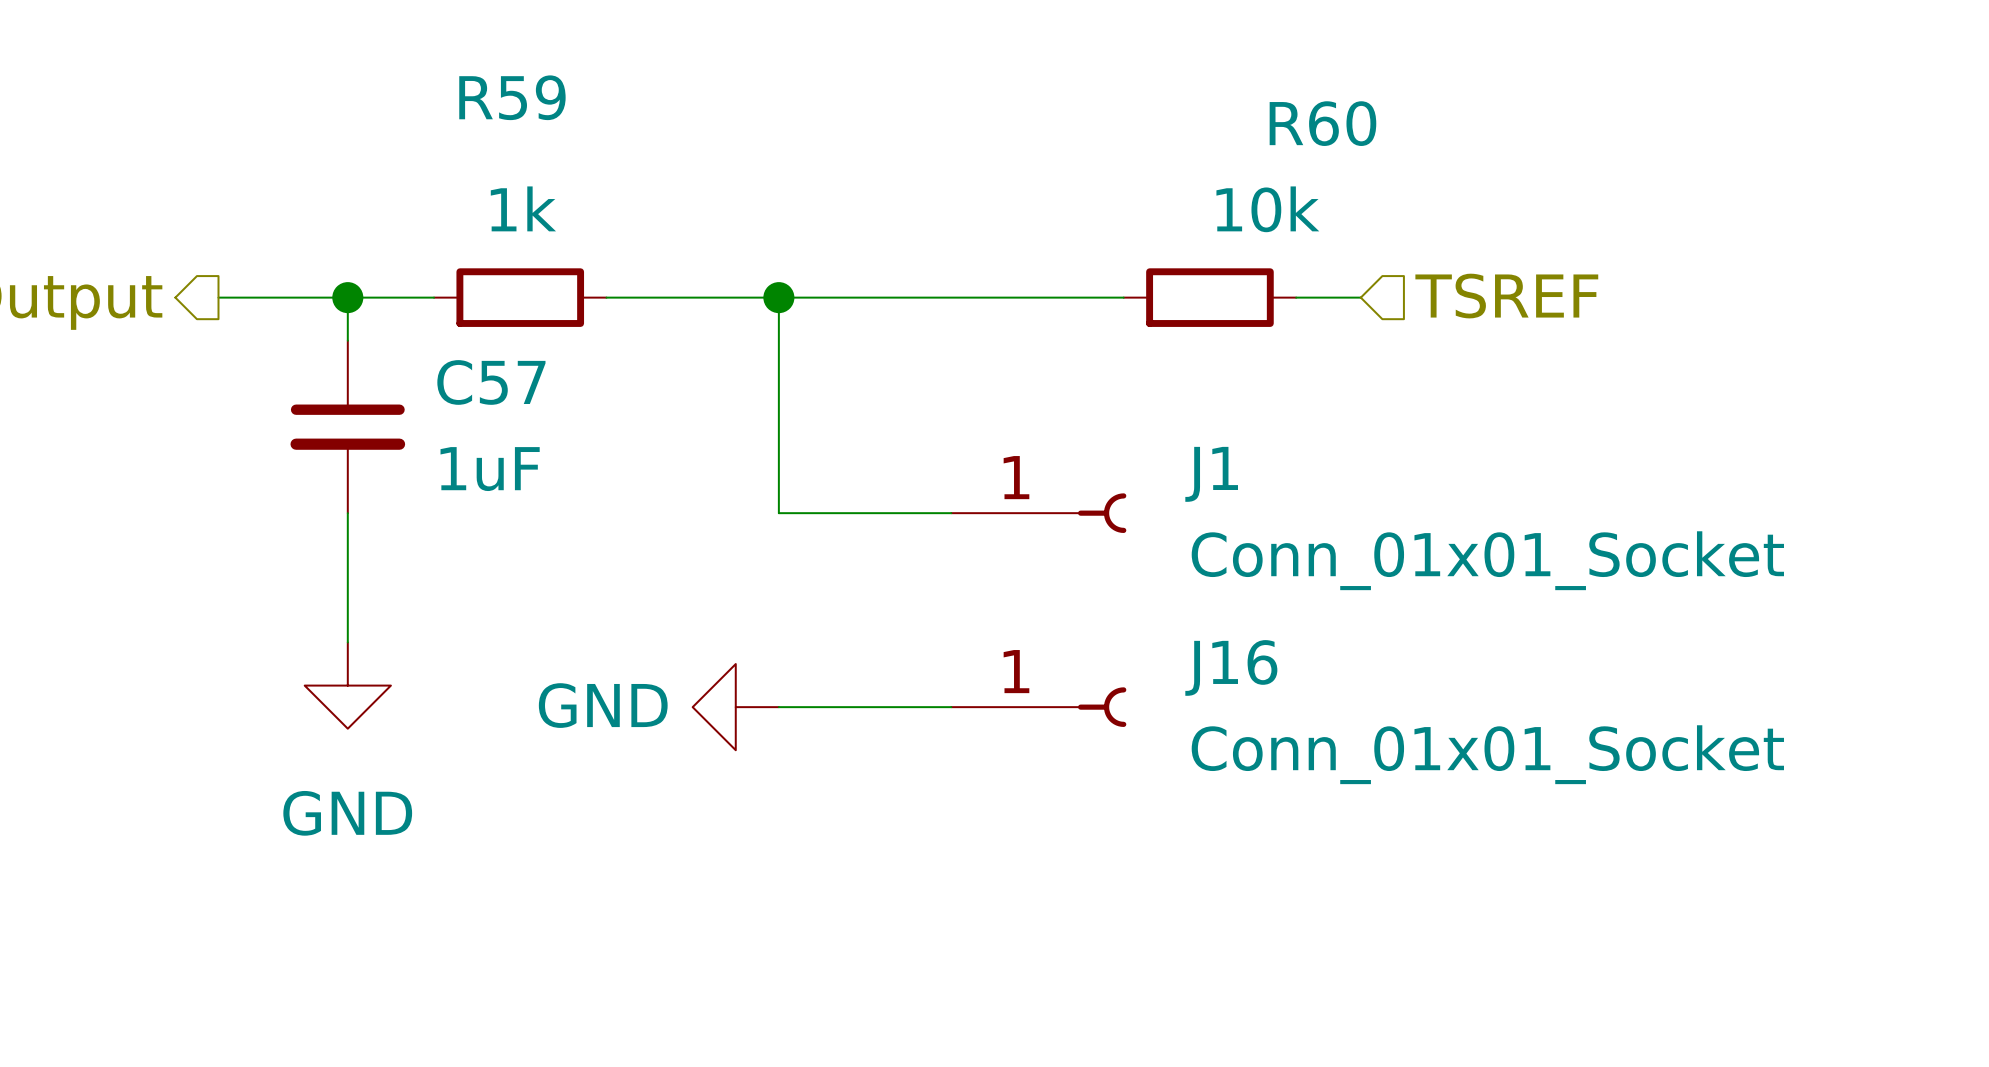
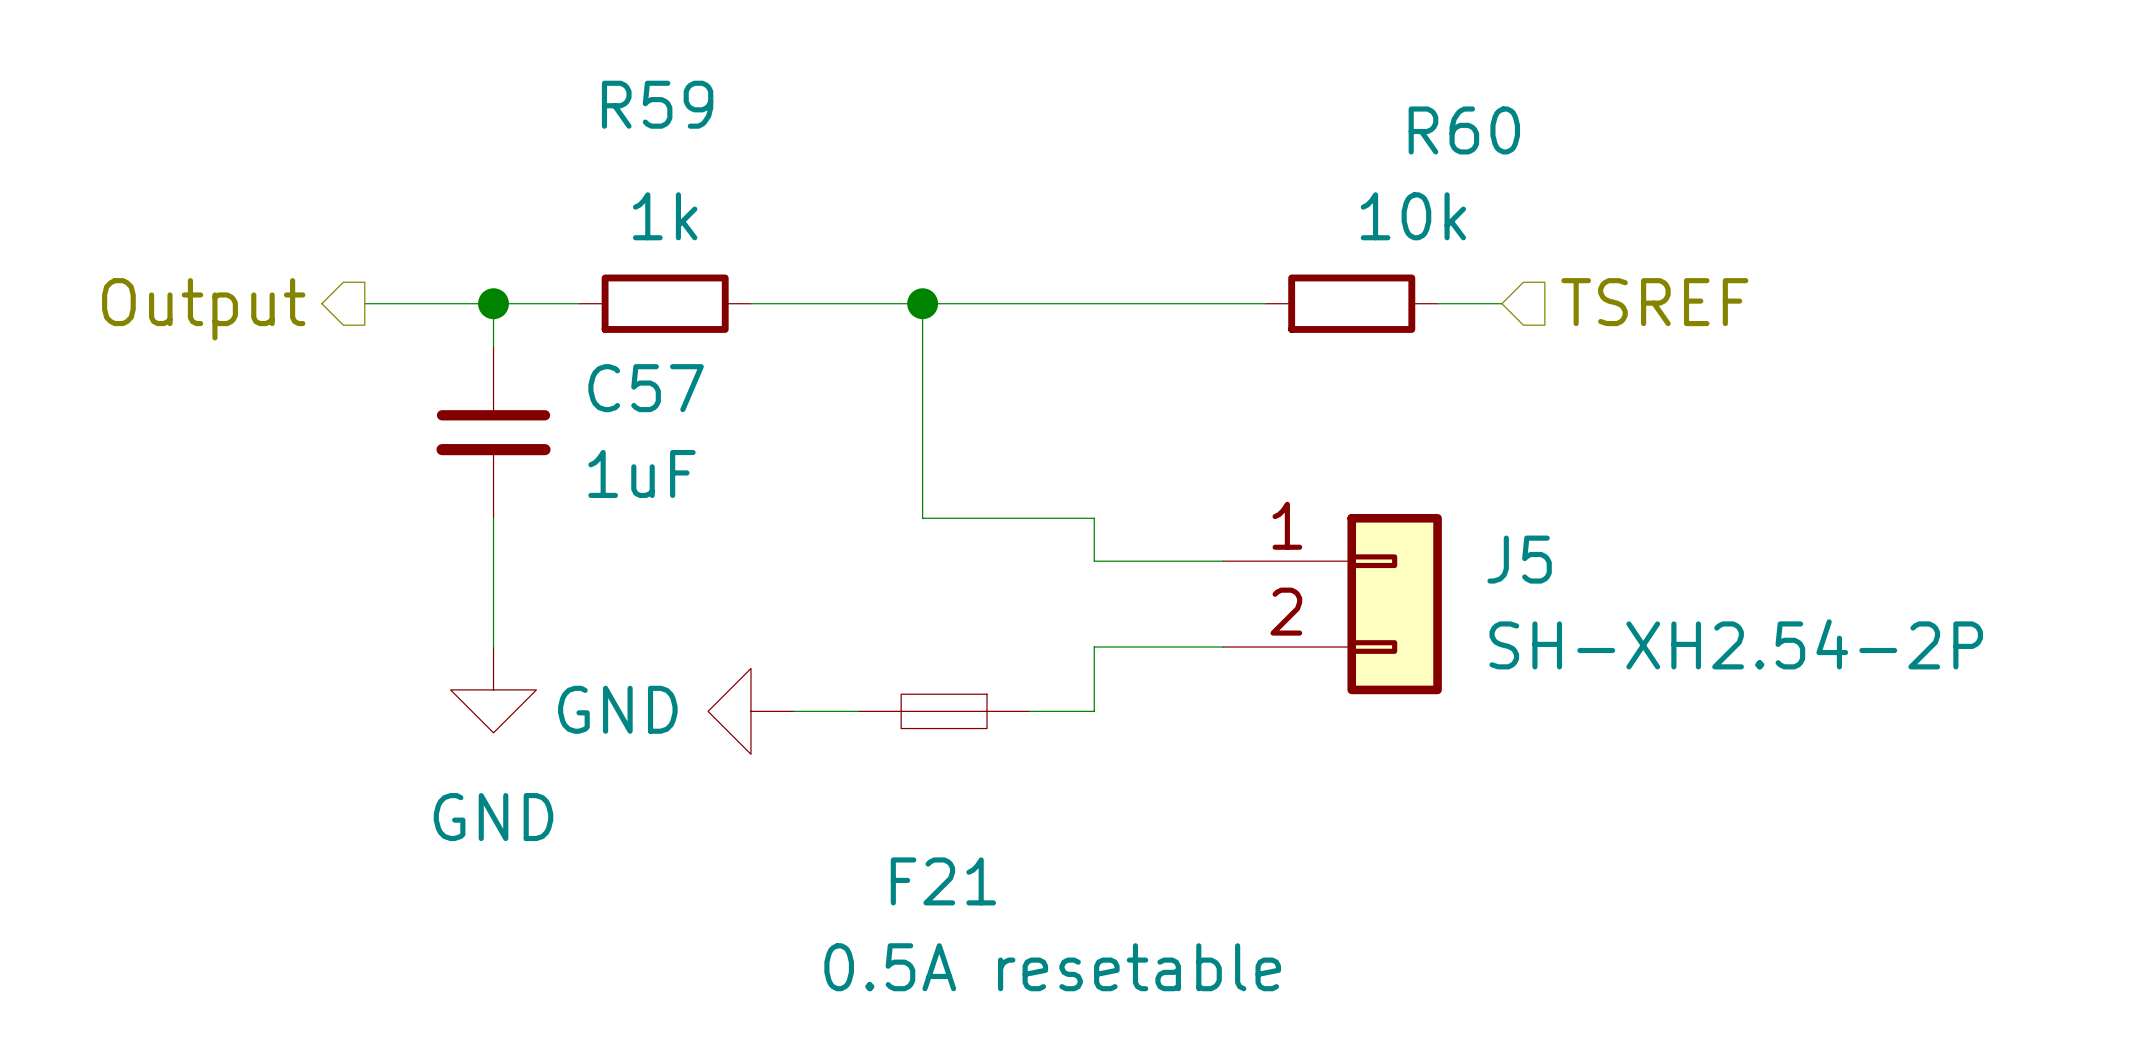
wire: none -> (1094, 518) (1094, 561) (1223, 561)
J1: Conn_01x01_Socket (1038, 513) -> none
J5: none -> SH-XH2.54-2P (1332, 604)
wire: none -> (1223, 647) (1094, 647) (1094, 711)
wire: none -> (793, 711) (858, 711)
power symbol position: GND (735, 707) -> GND (750, 711)
F21: none -> 0.5A resetable (944, 711)
J16: Conn_01x01_Socket (1038, 707) -> none

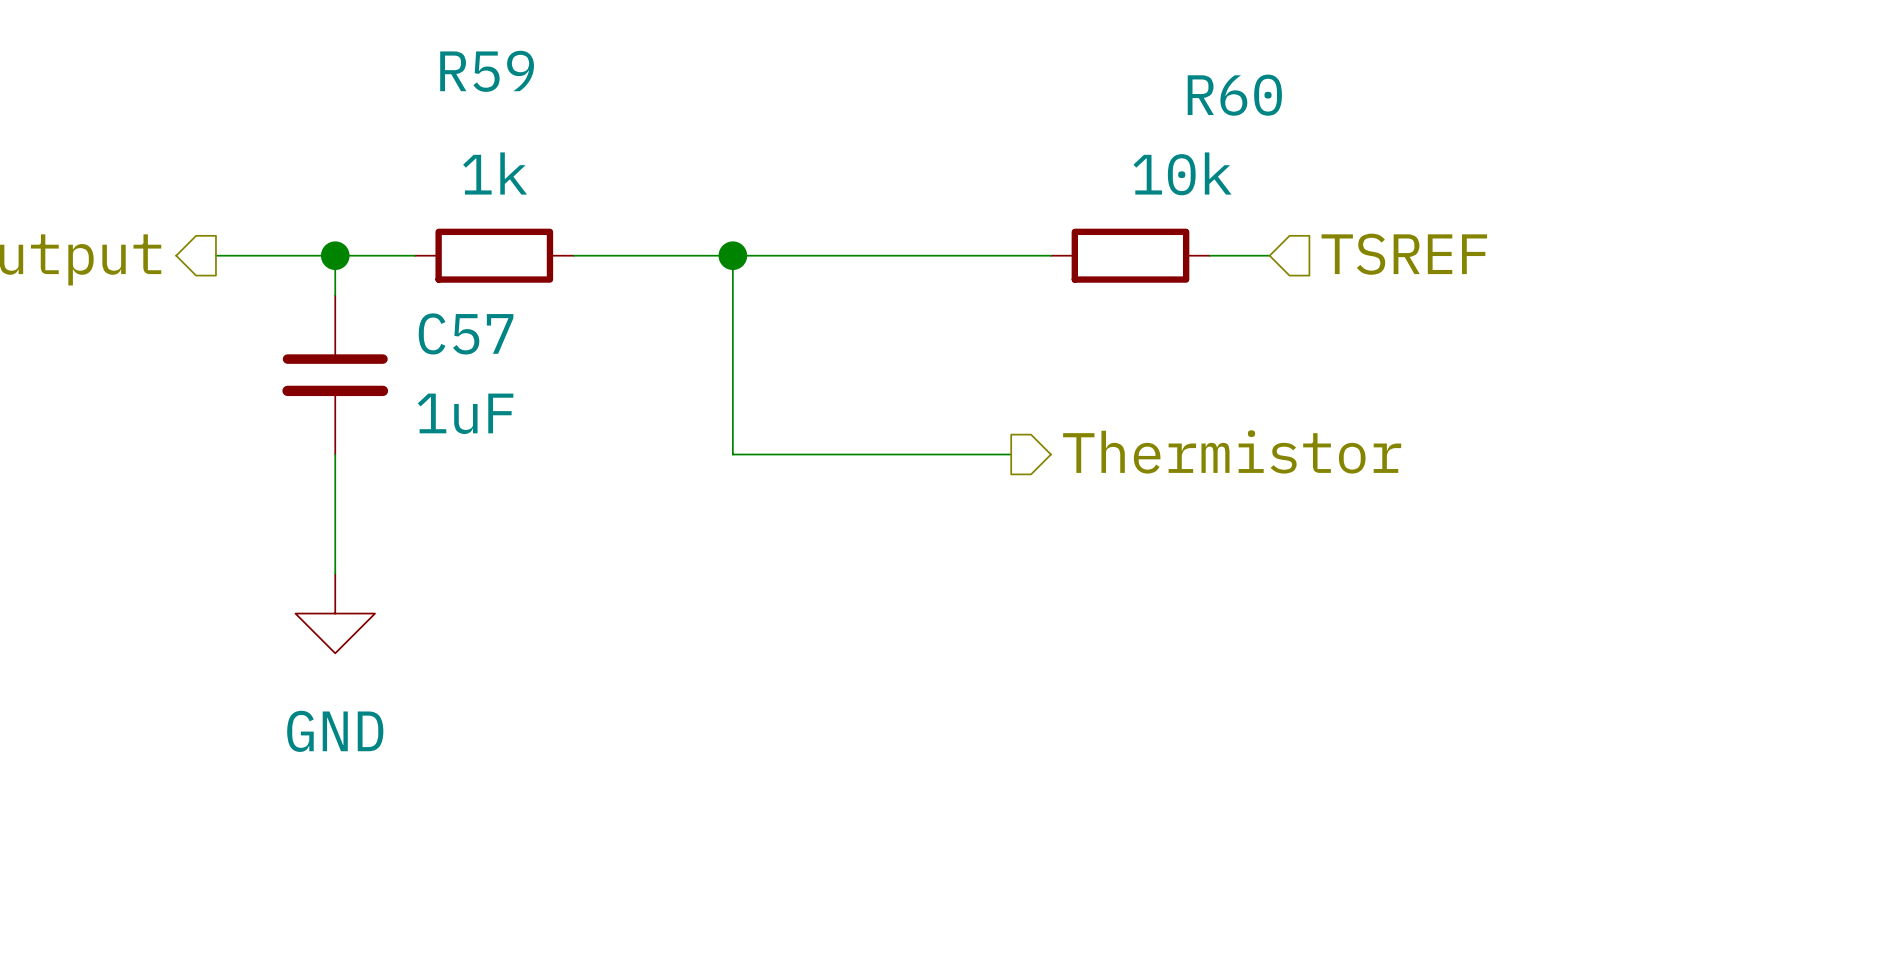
hierarchical label: none -> Thermistor (1232, 451)
wire: (1094, 518) (1094, 561) (1223, 561) -> (891, 454) (1011, 454)
J5: SH-XH2.54-2P (1332, 604) -> none
wire: (1223, 647) (1094, 647) (1094, 711) (1029, 711) -> none
power symbol: GND (750, 711) -> none
wire: (793, 711) (858, 711) -> none
F21: 0.5A resetable (944, 711) -> none

